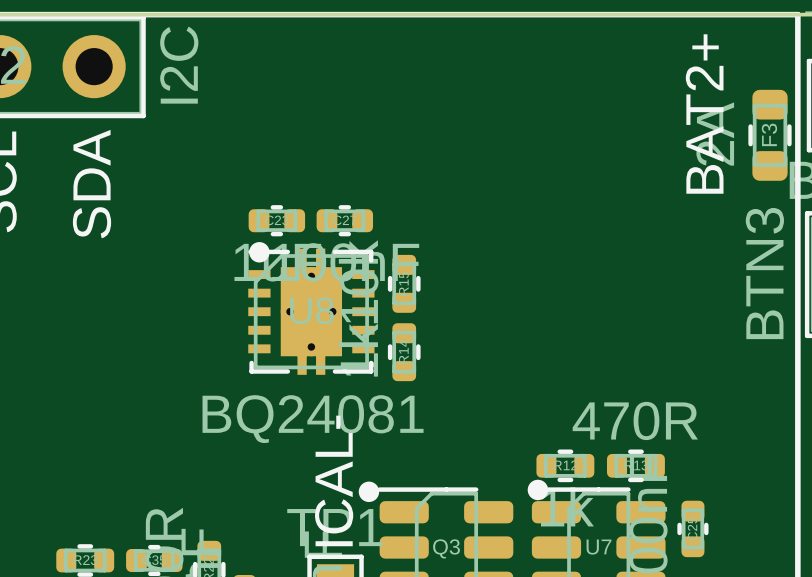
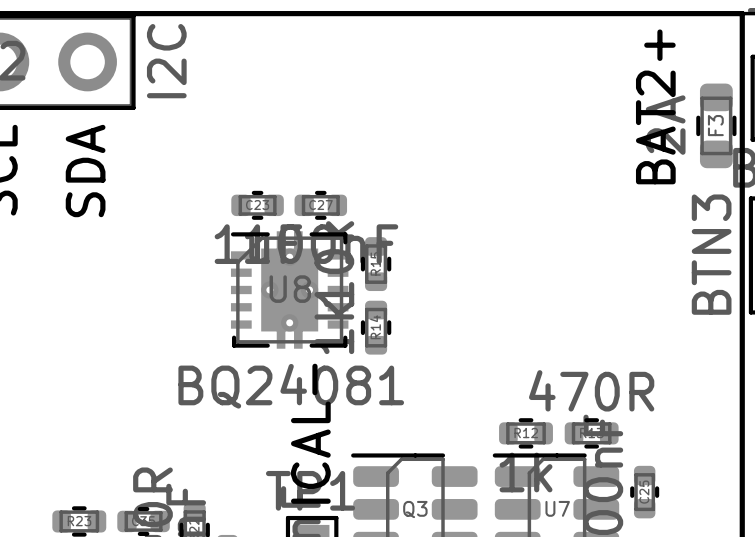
drawing: [249, 242, 270, 263] -> none
drawing: [527, 479, 549, 501] -> none
drawing: [358, 481, 380, 503] -> none

